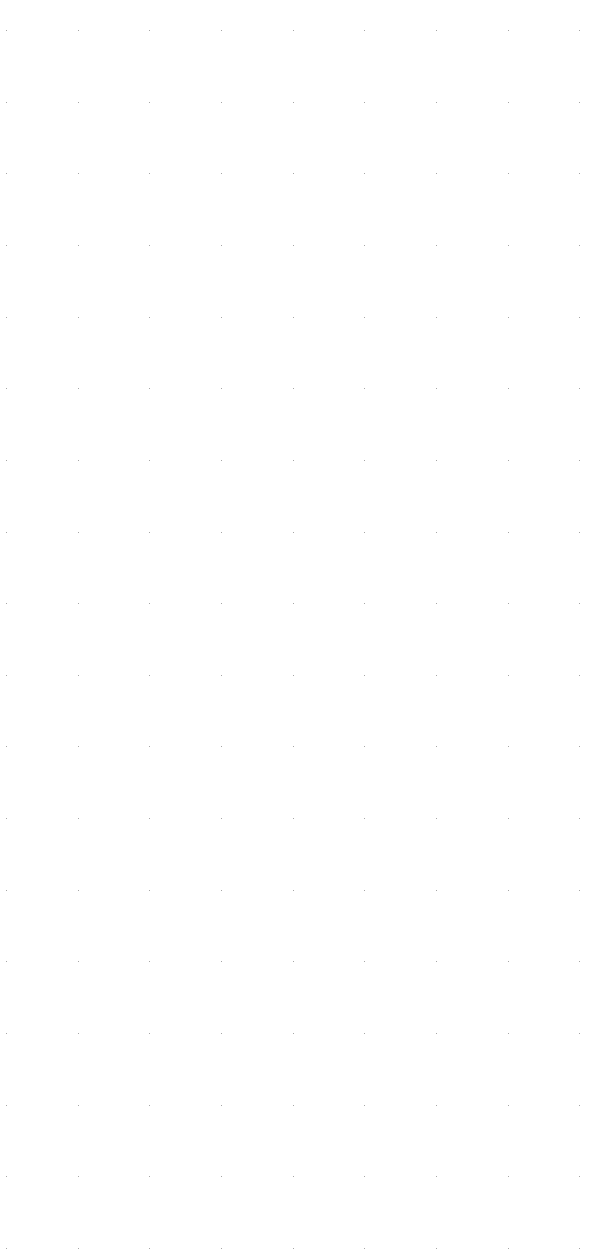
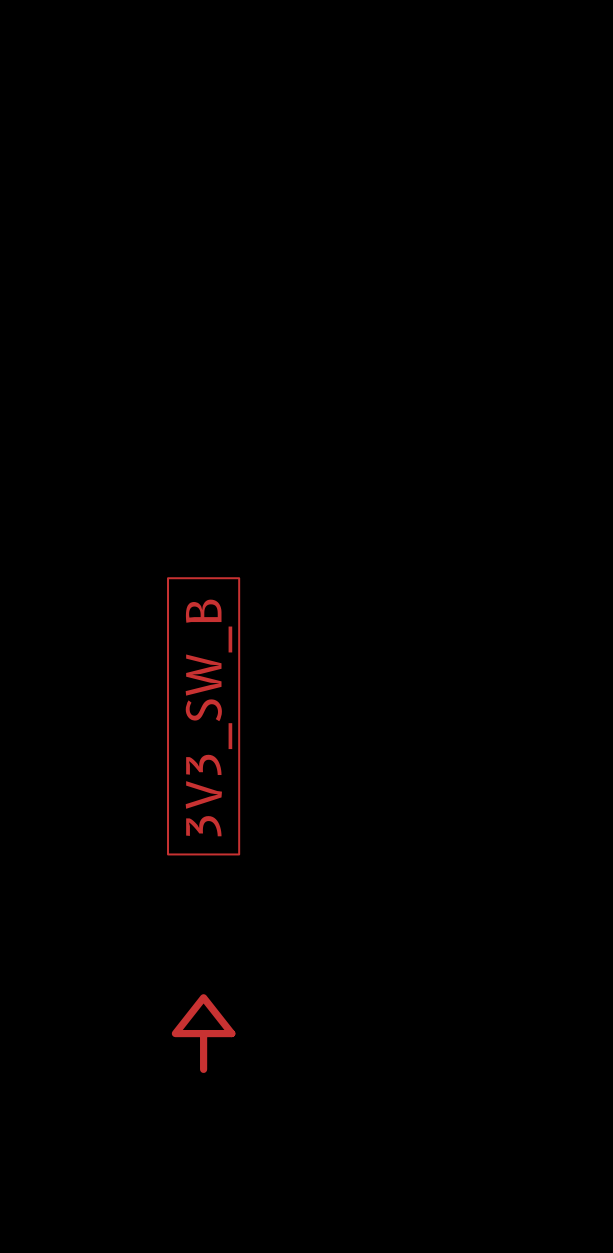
global label: none -> 3V3_SW_B (208, 717)
power symbol: none -> (203, 1033)

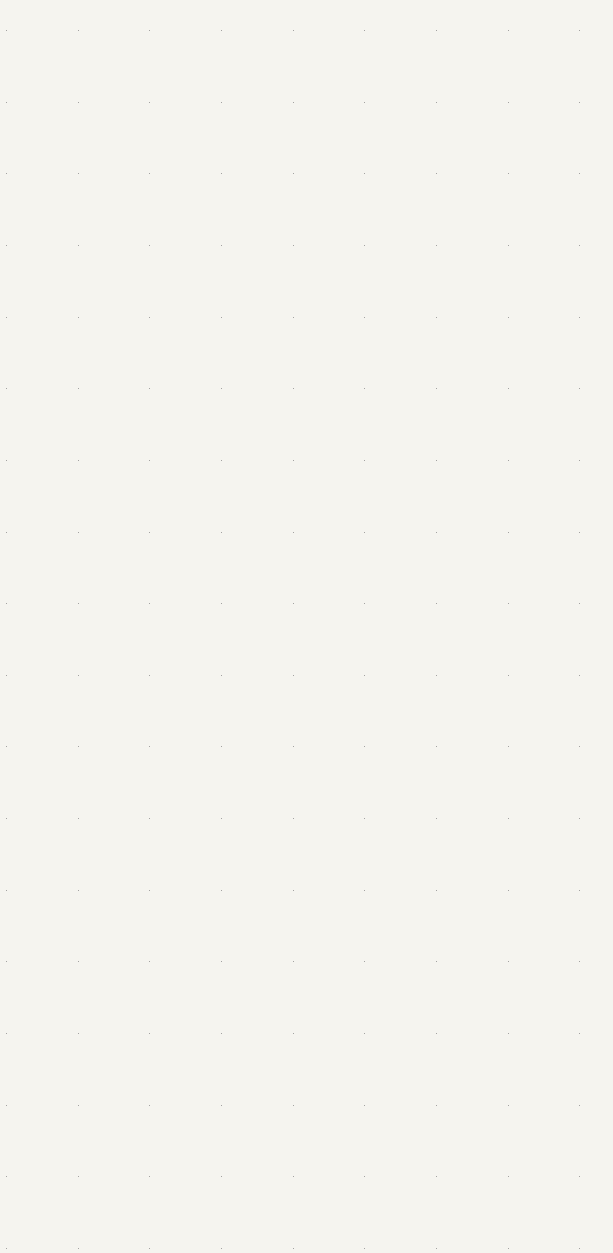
global label: 3V3_SW_B (208, 717) -> none
power symbol: (203, 1033) -> none

